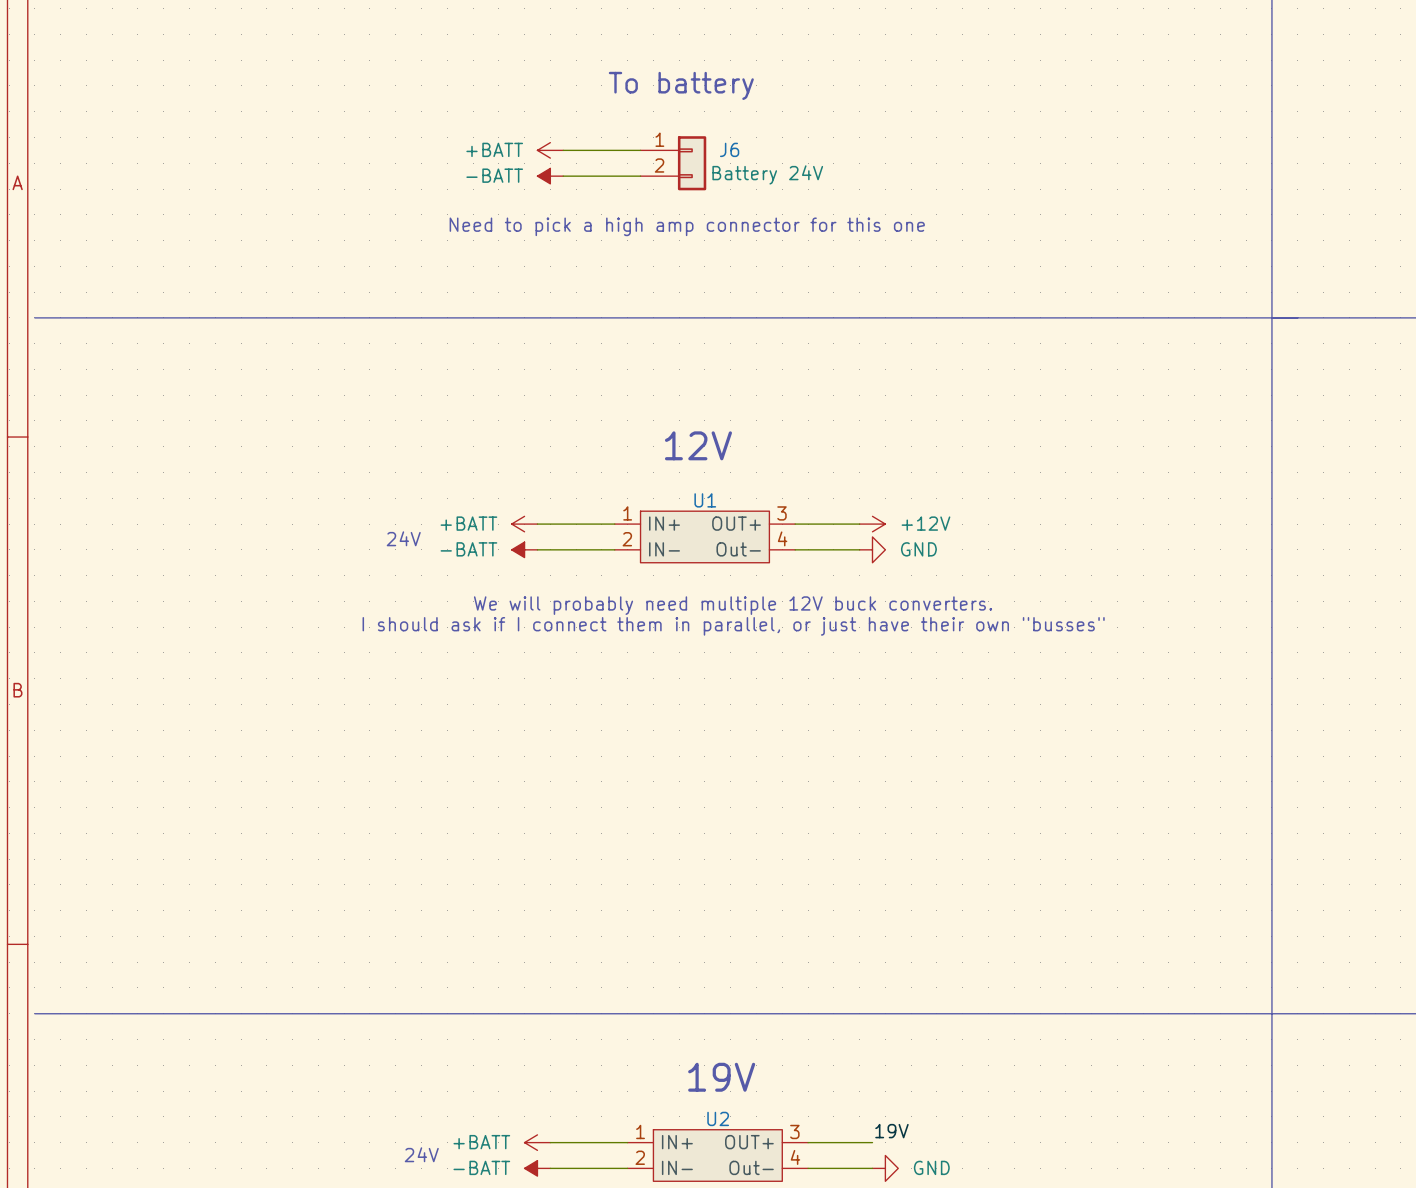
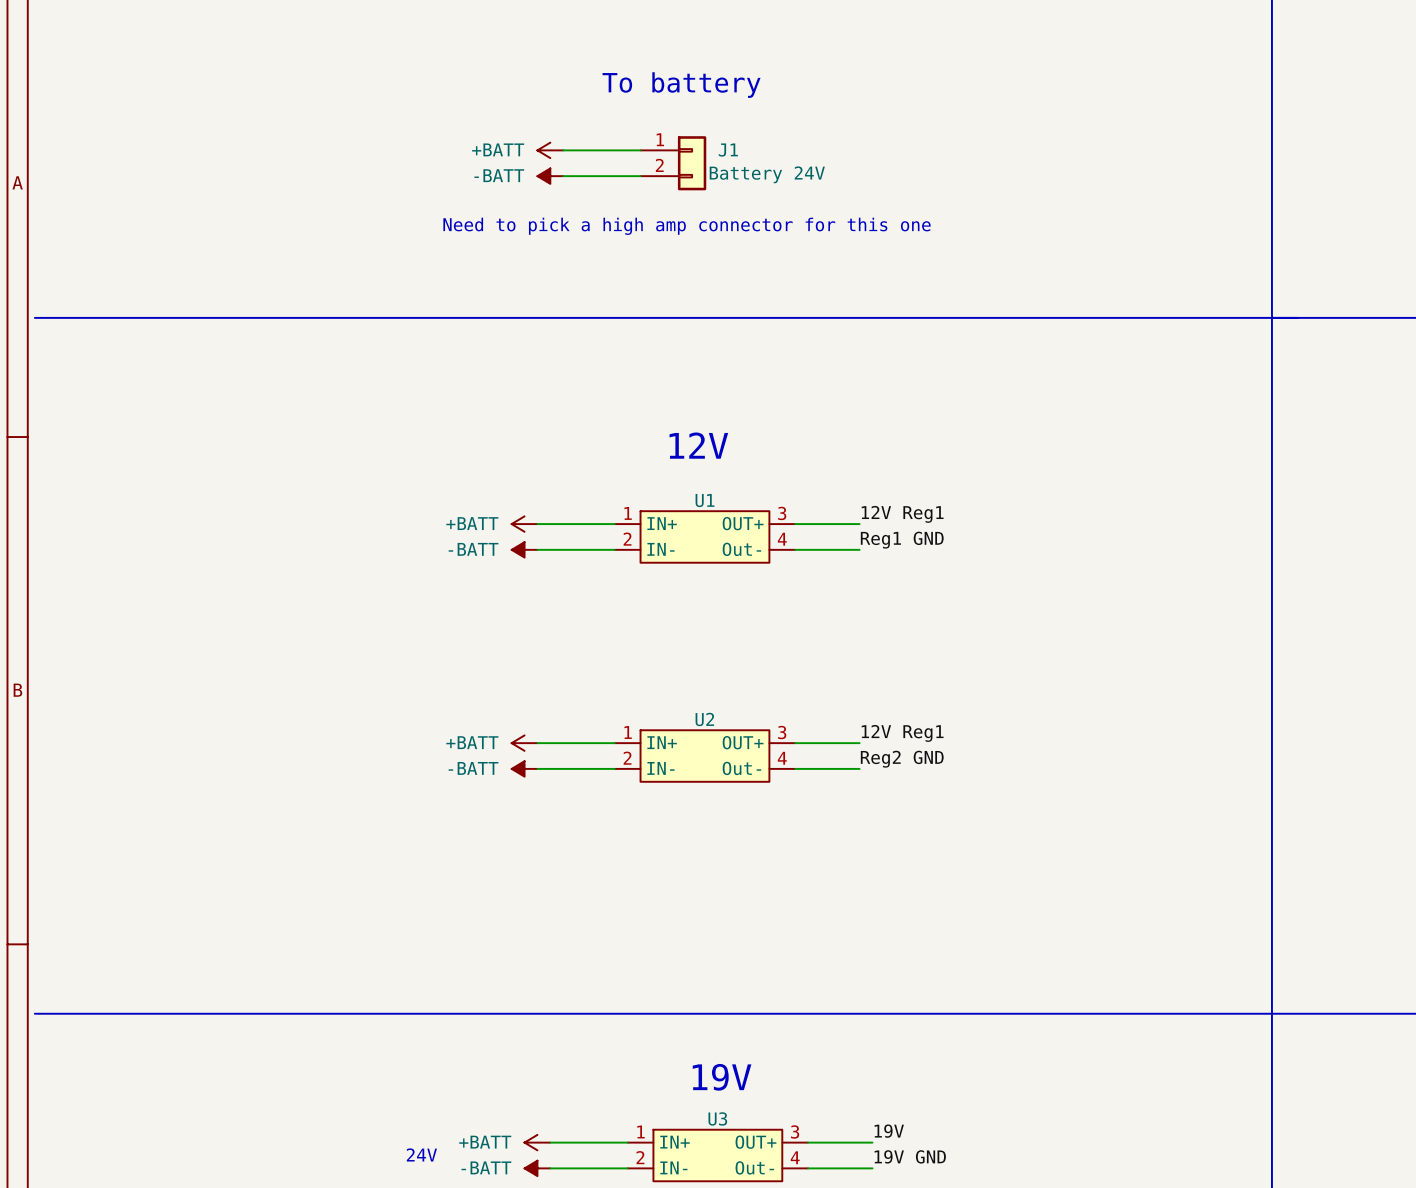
J6 name: J6 (729, 149) -> J1 (728, 150)
label: none -> 12V Reg1 (902, 514)
power symbol: +12V (872, 524) -> none
text: 24V (403, 538) -> none
label: none -> Reg1 GND (902, 540)
power symbol: GND (872, 549) -> none
text: We will probably need multiple 12V buck converters. (733, 605) -> none
text: I should ask if I connect them in parallel, or just have their own "busses" (733, 626) -> none
label: none -> 12V Reg1 (902, 733)
power symbol: none -> +BATT (524, 743)
wire: none -> (537, 743) (614, 743)
wire: none -> (795, 743) (859, 743)
U2: none -> (704, 756)
label: none -> Reg2 GND (902, 759)
power symbol: none -> -BATT (524, 768)
wire: none -> (537, 768) (614, 768)
wire: none -> (795, 768) (859, 768)
U2 name: U2 (718, 1118) -> U3 (717, 1118)
label: none -> 19V GND (910, 1156)
power symbol: GND (885, 1168) -> none

